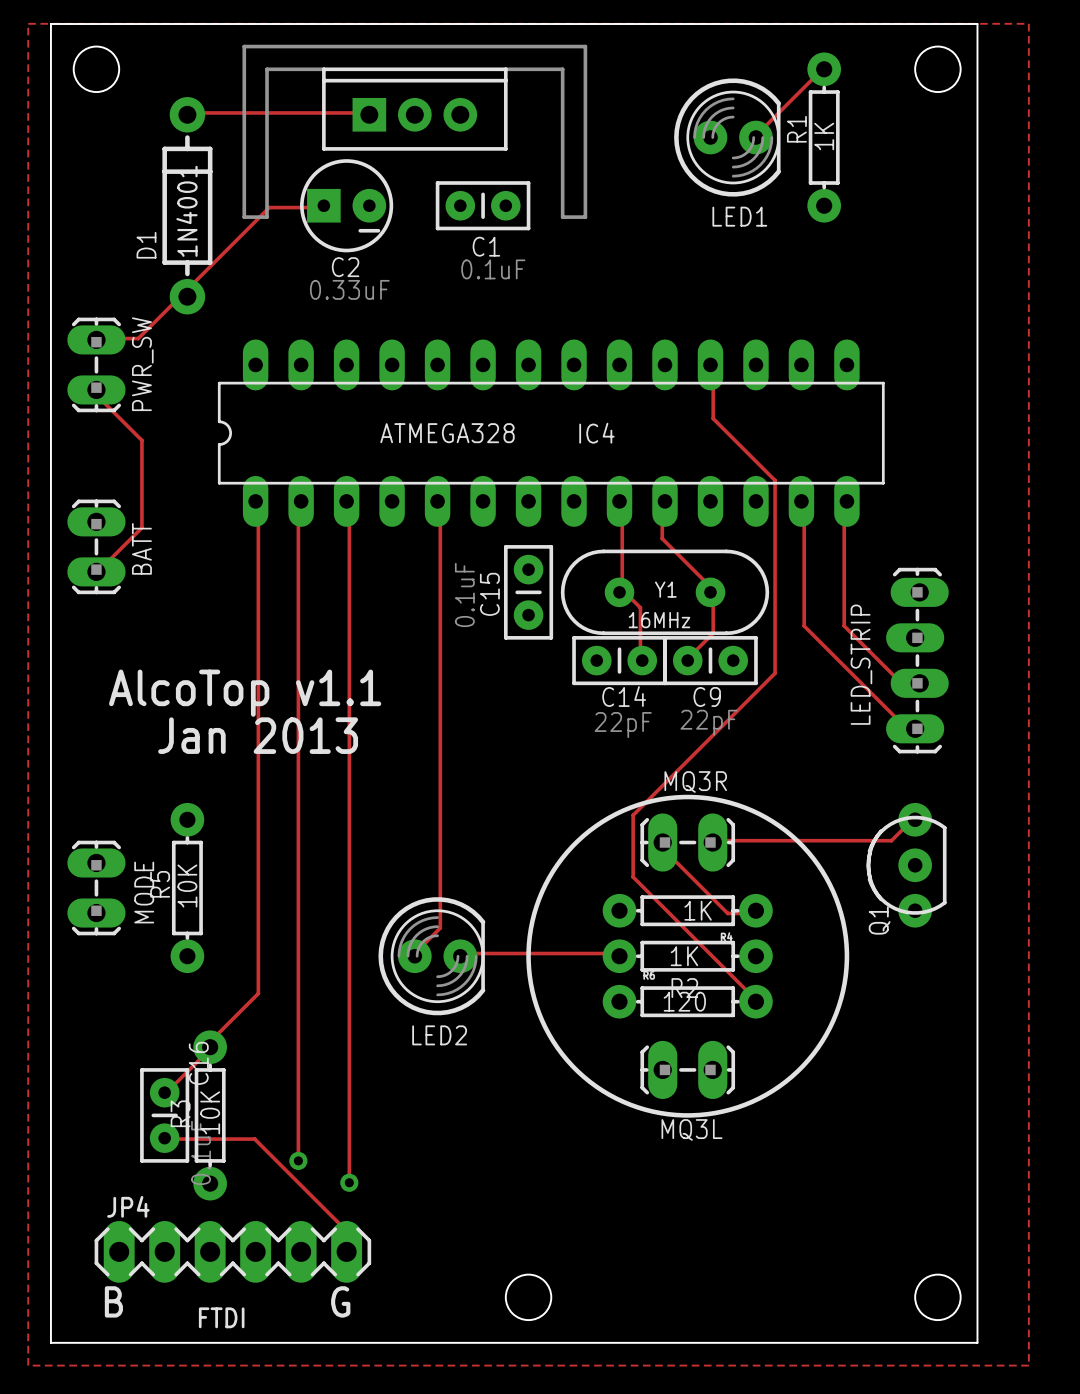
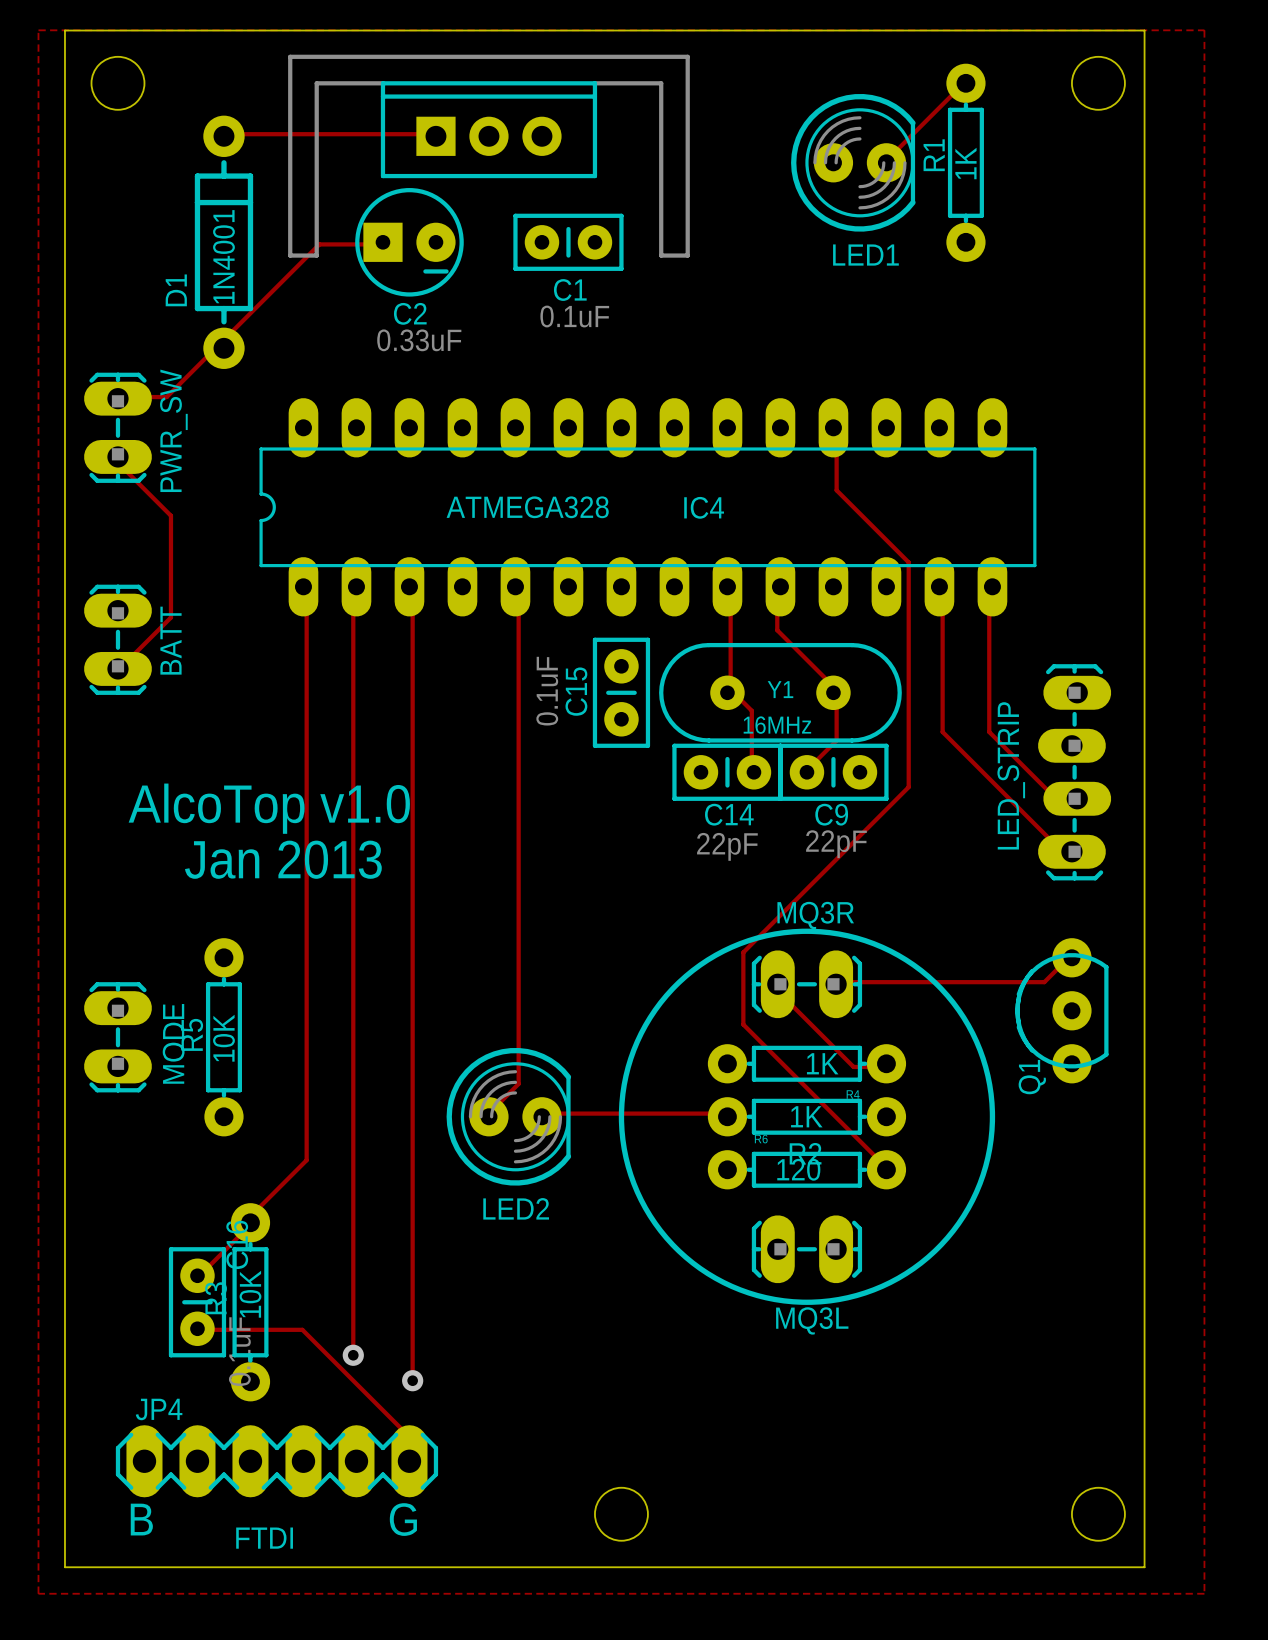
text: AlcoTop v1.1 (245, 693) -> AlcoTop v1.0 (269, 808)

